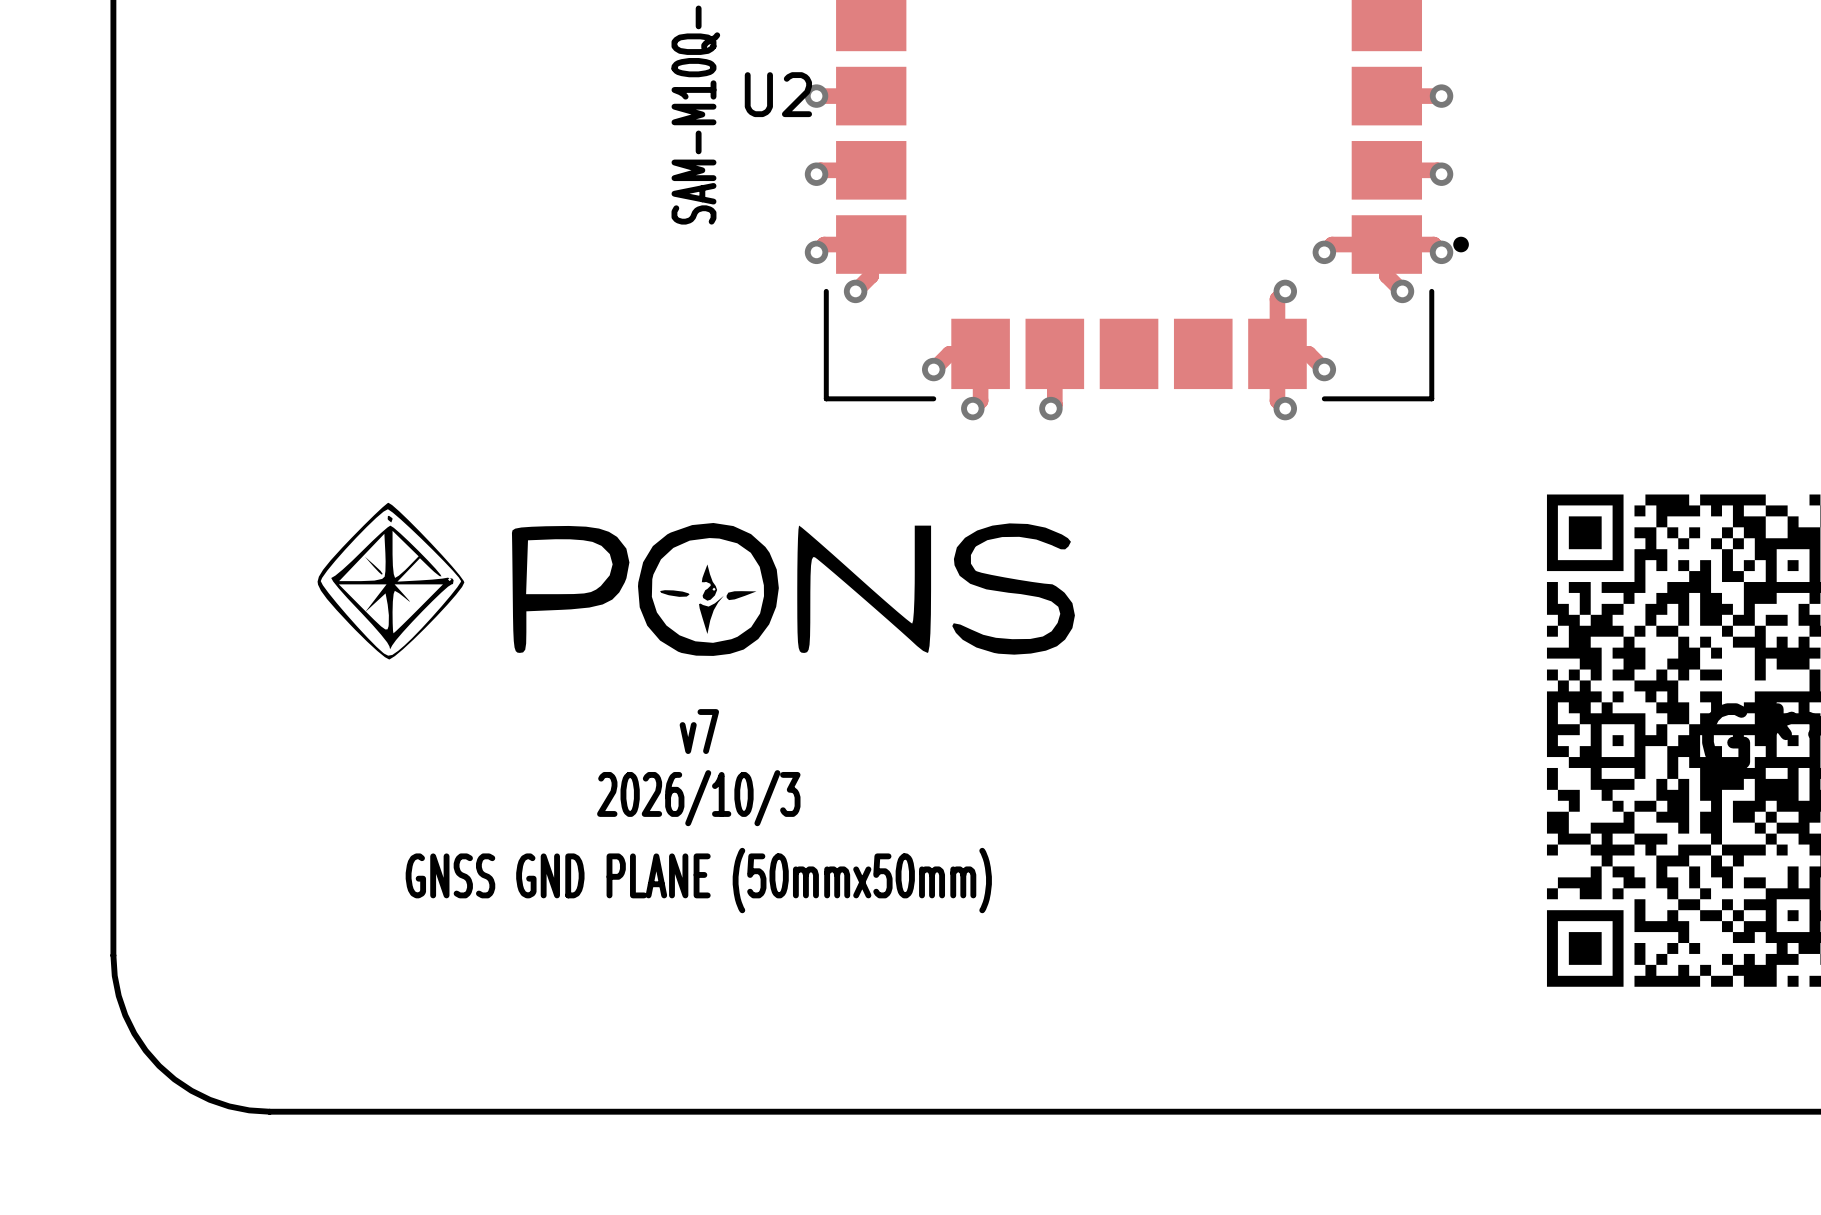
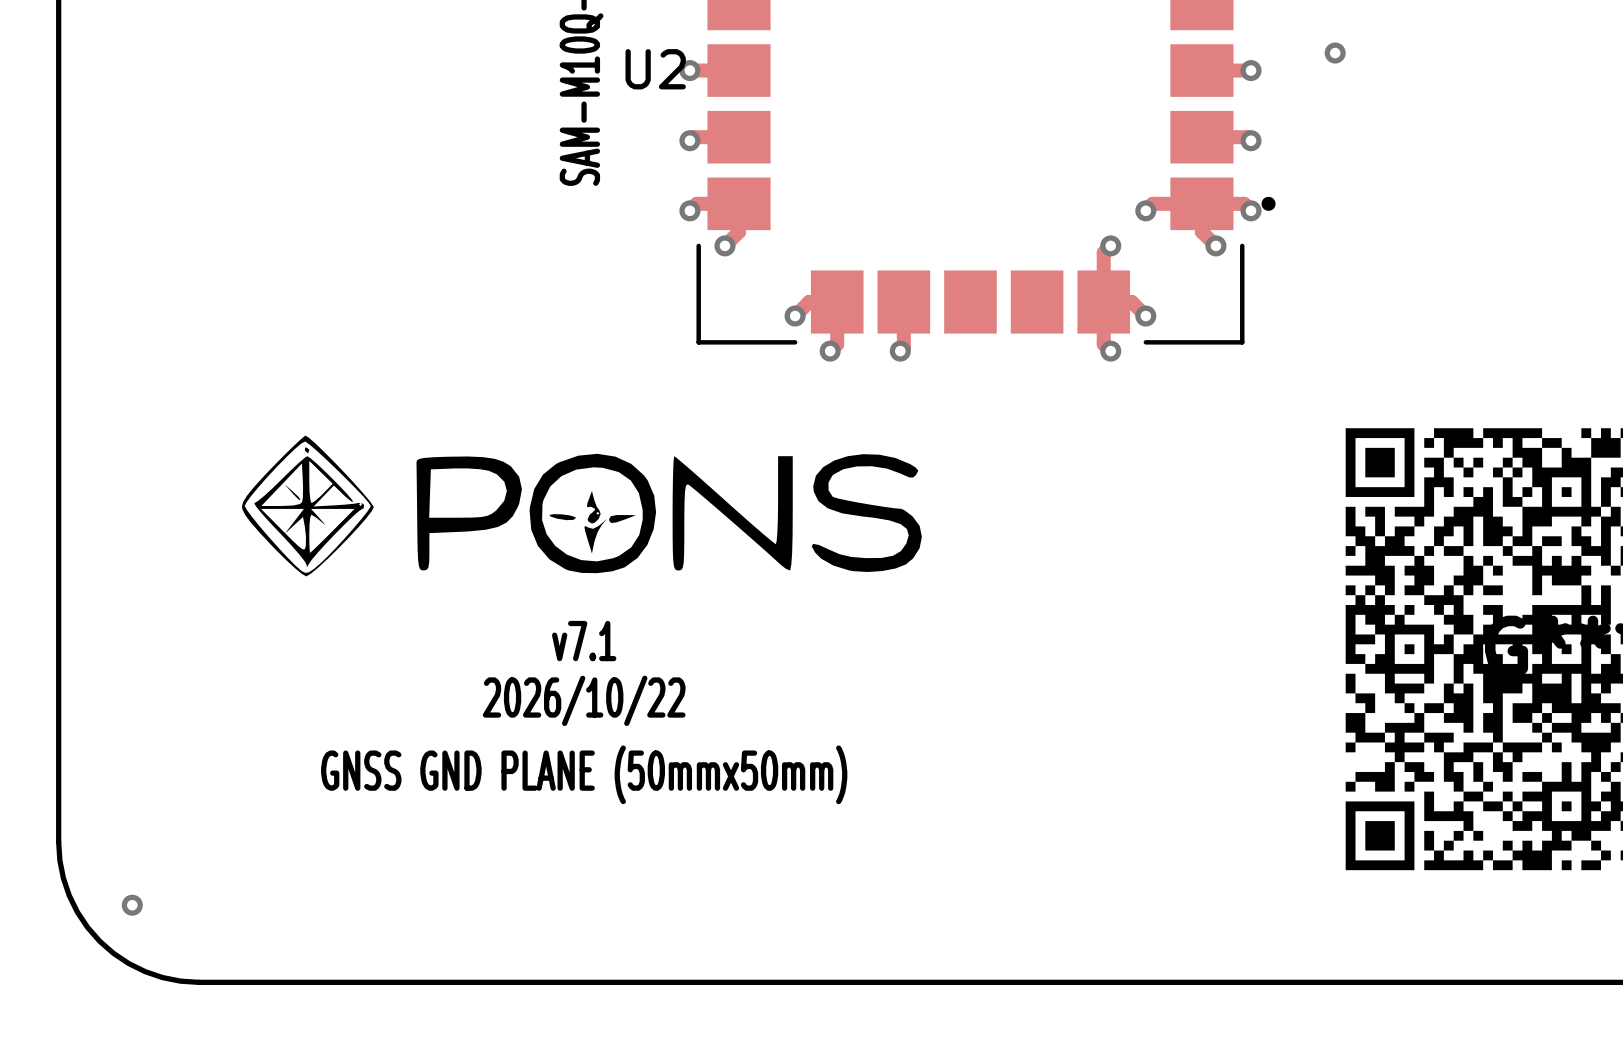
via: none -> (1335, 53)
text: v7 (699, 731) -> v7.1 (584, 641)
text: 2026/10/3 (698, 798) -> 2026/10/22 (584, 700)
via: none -> (132, 905)

